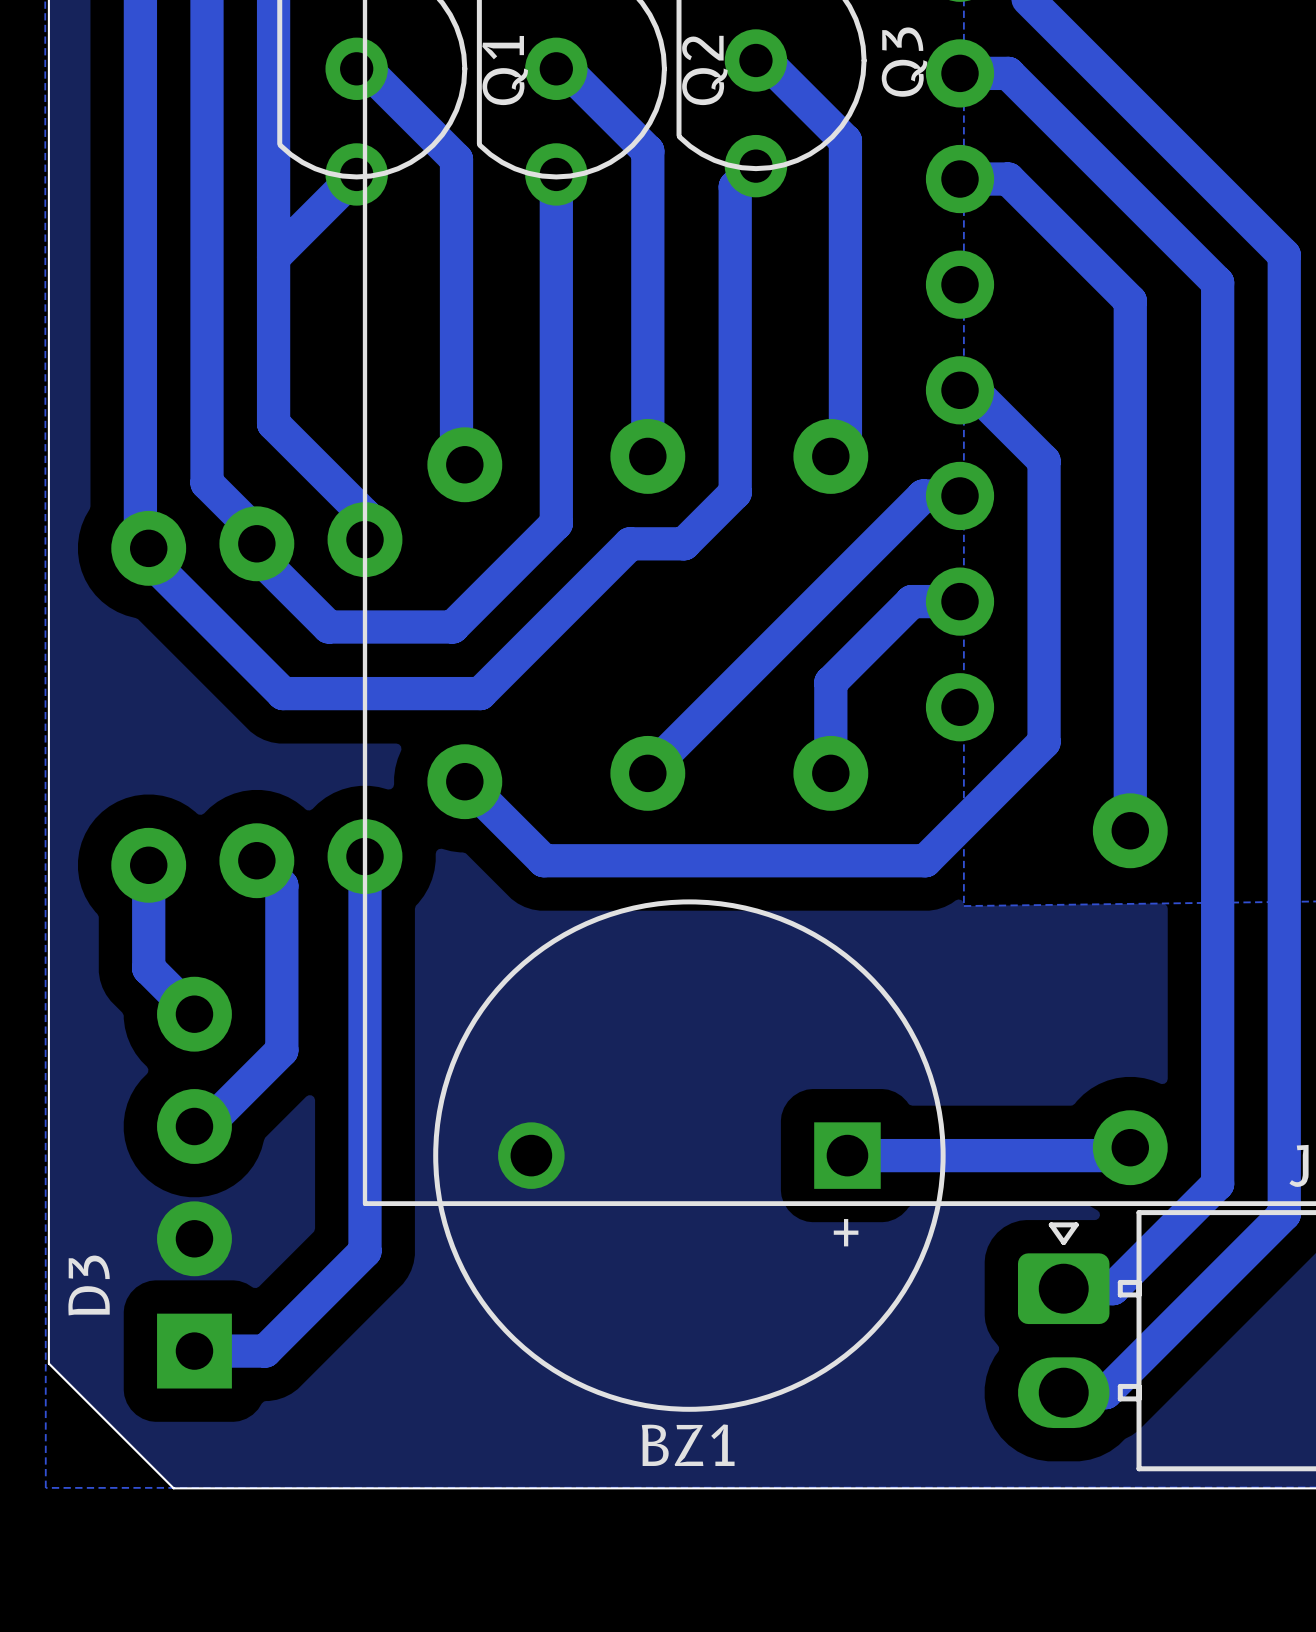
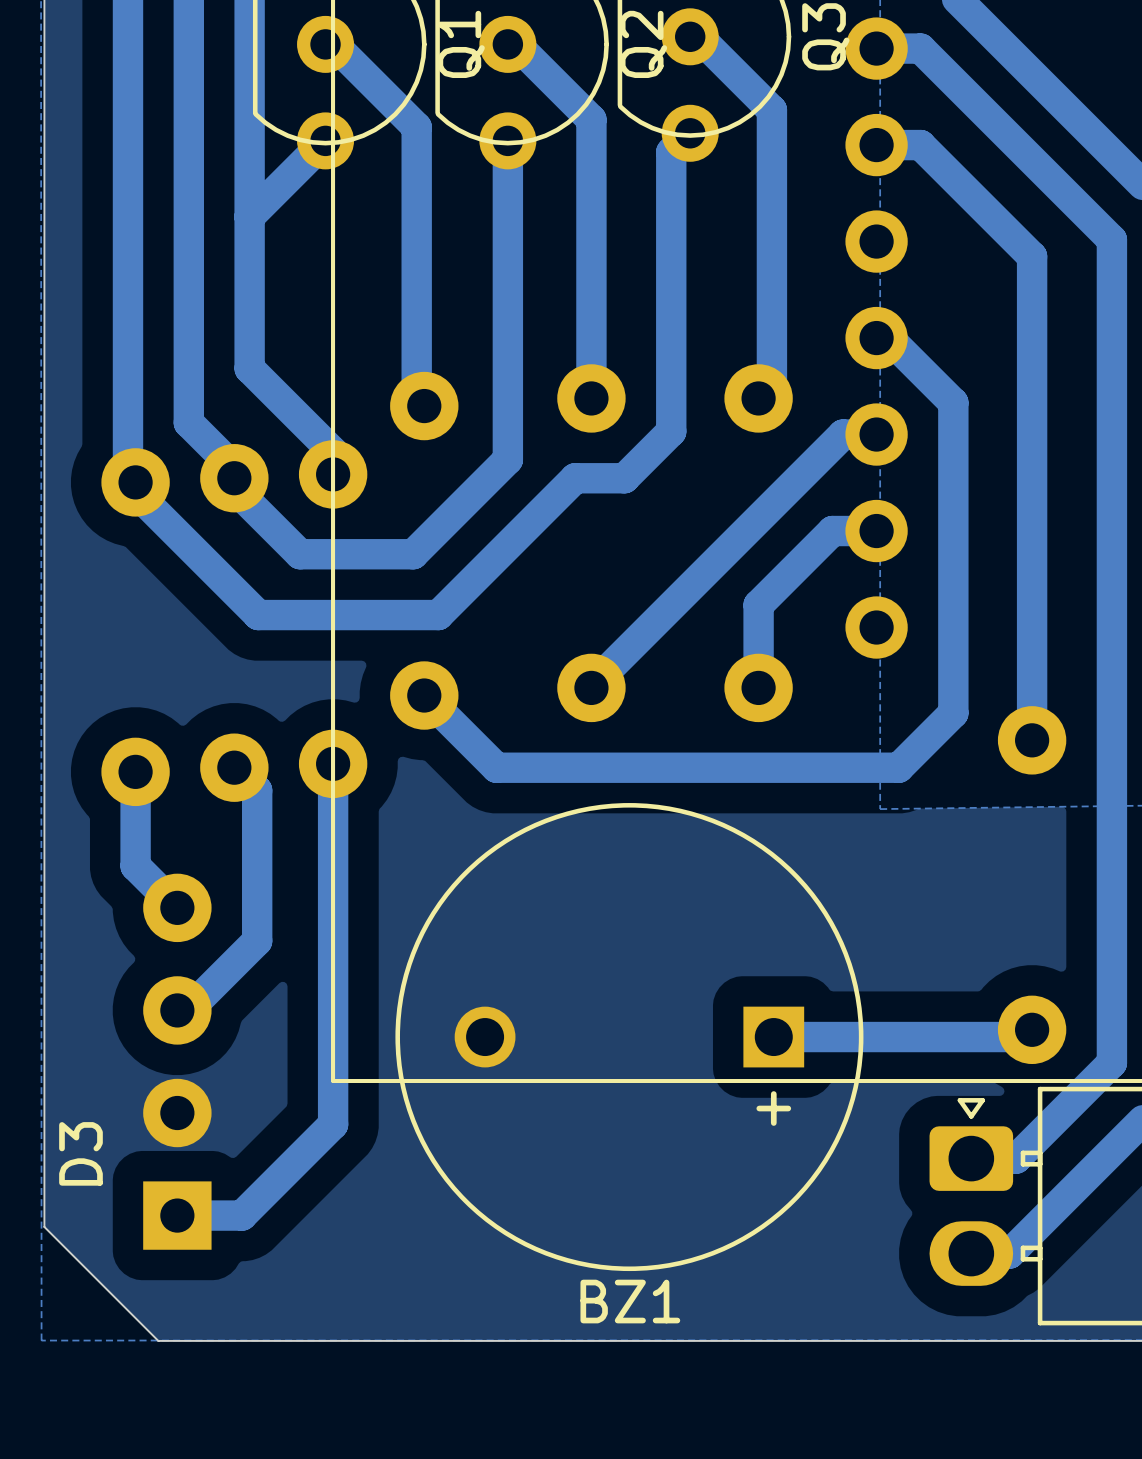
bottom track: (1044, 742) (925, 860) -> (953, 659) (953, 713) (898, 767) (844, 767)

